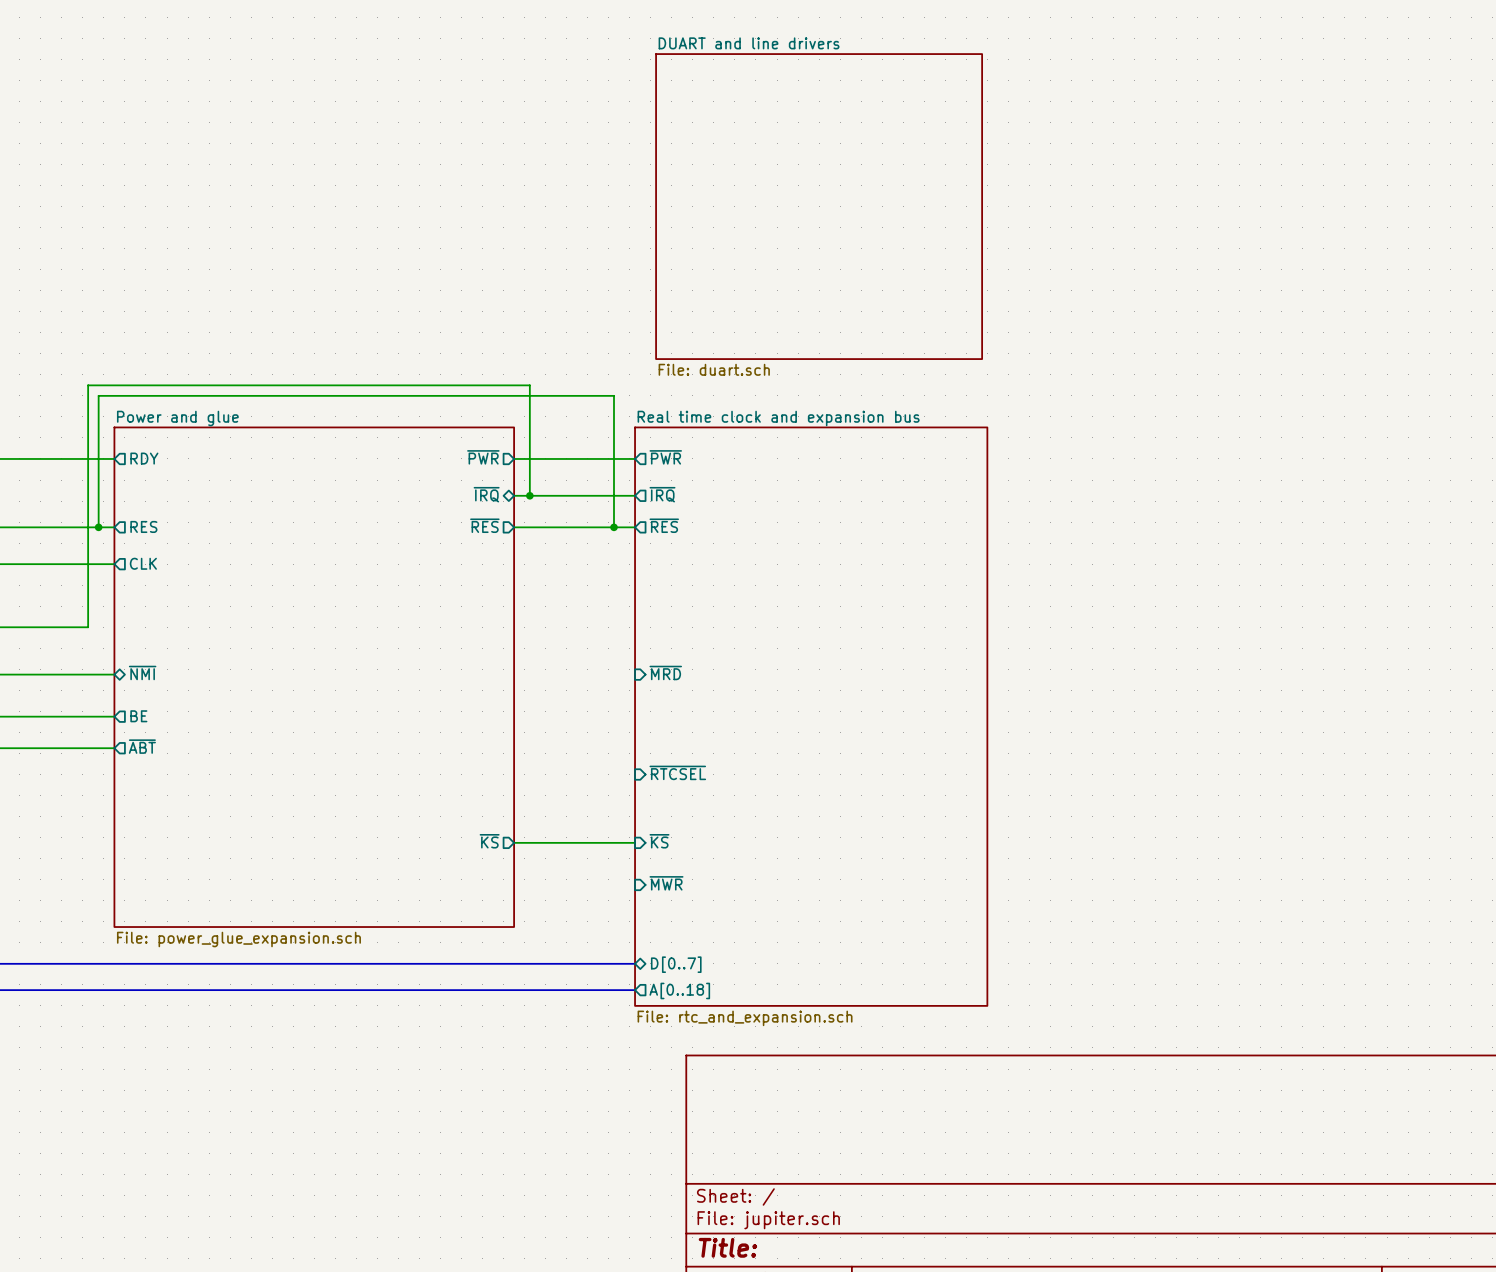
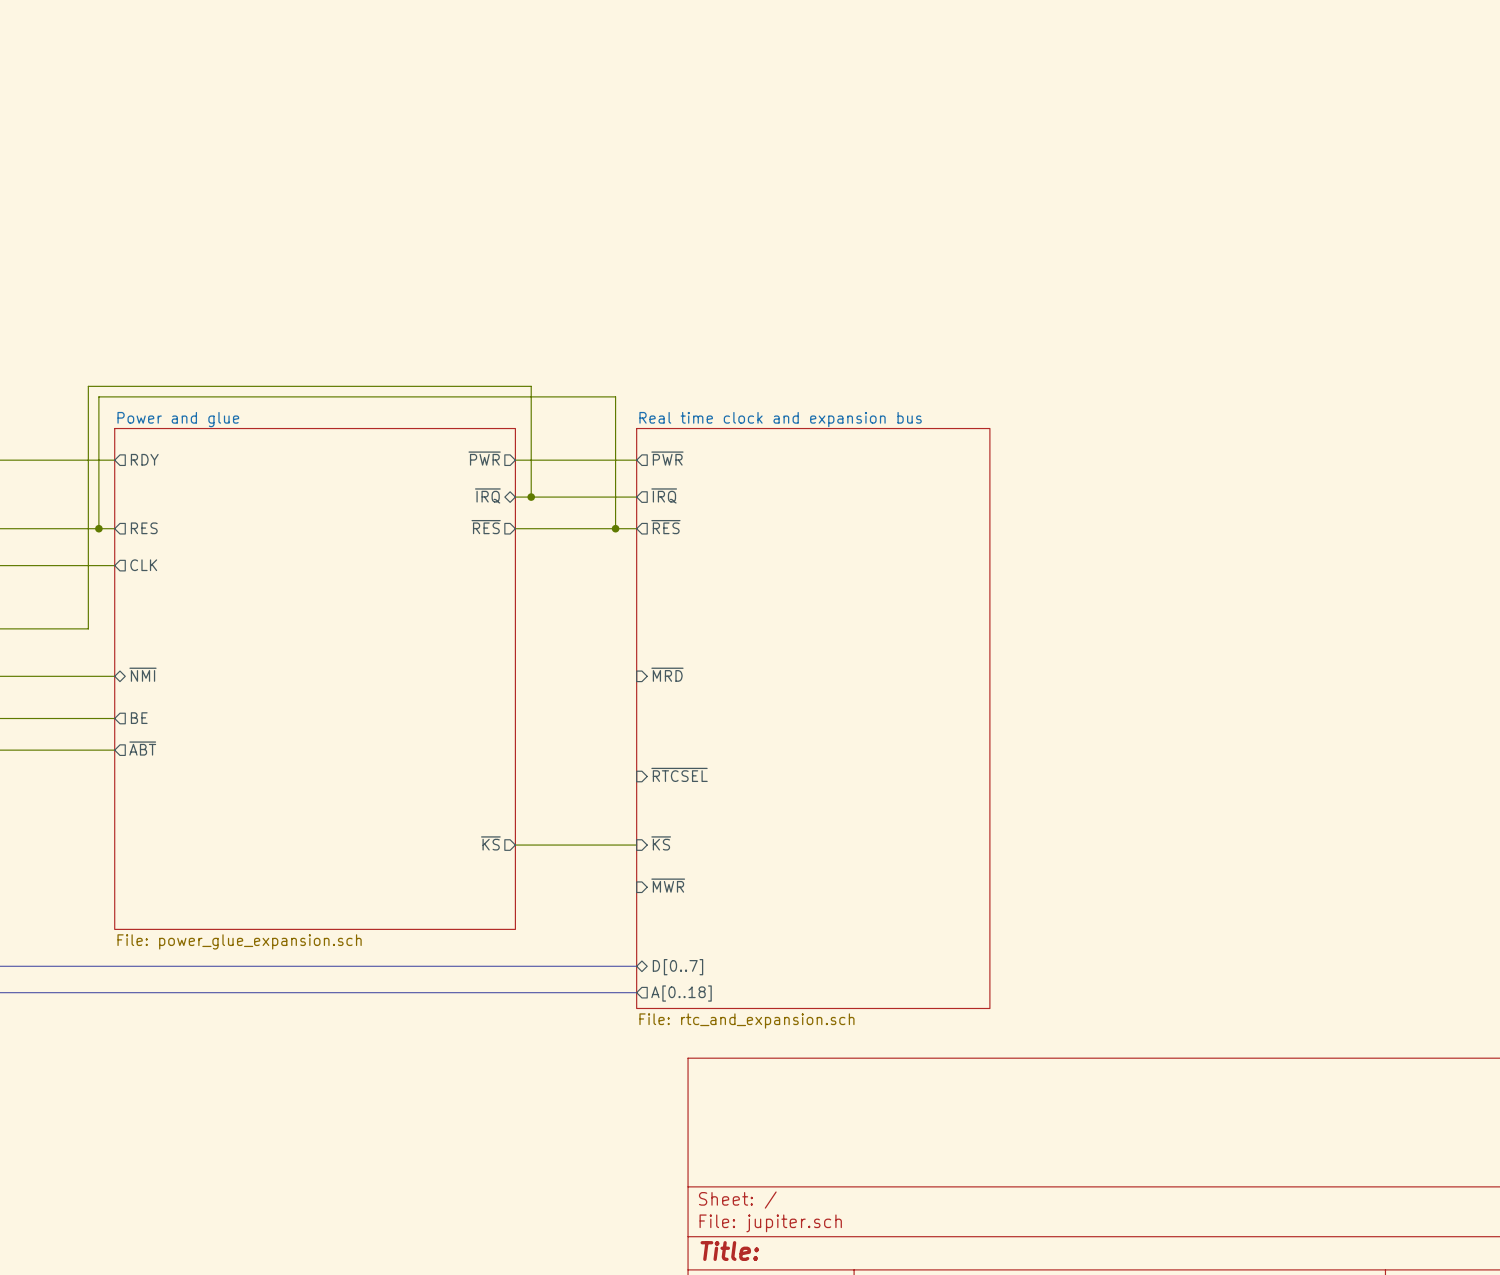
sheet DUART and line drivers: File: duart.sch (819, 206) -> none

